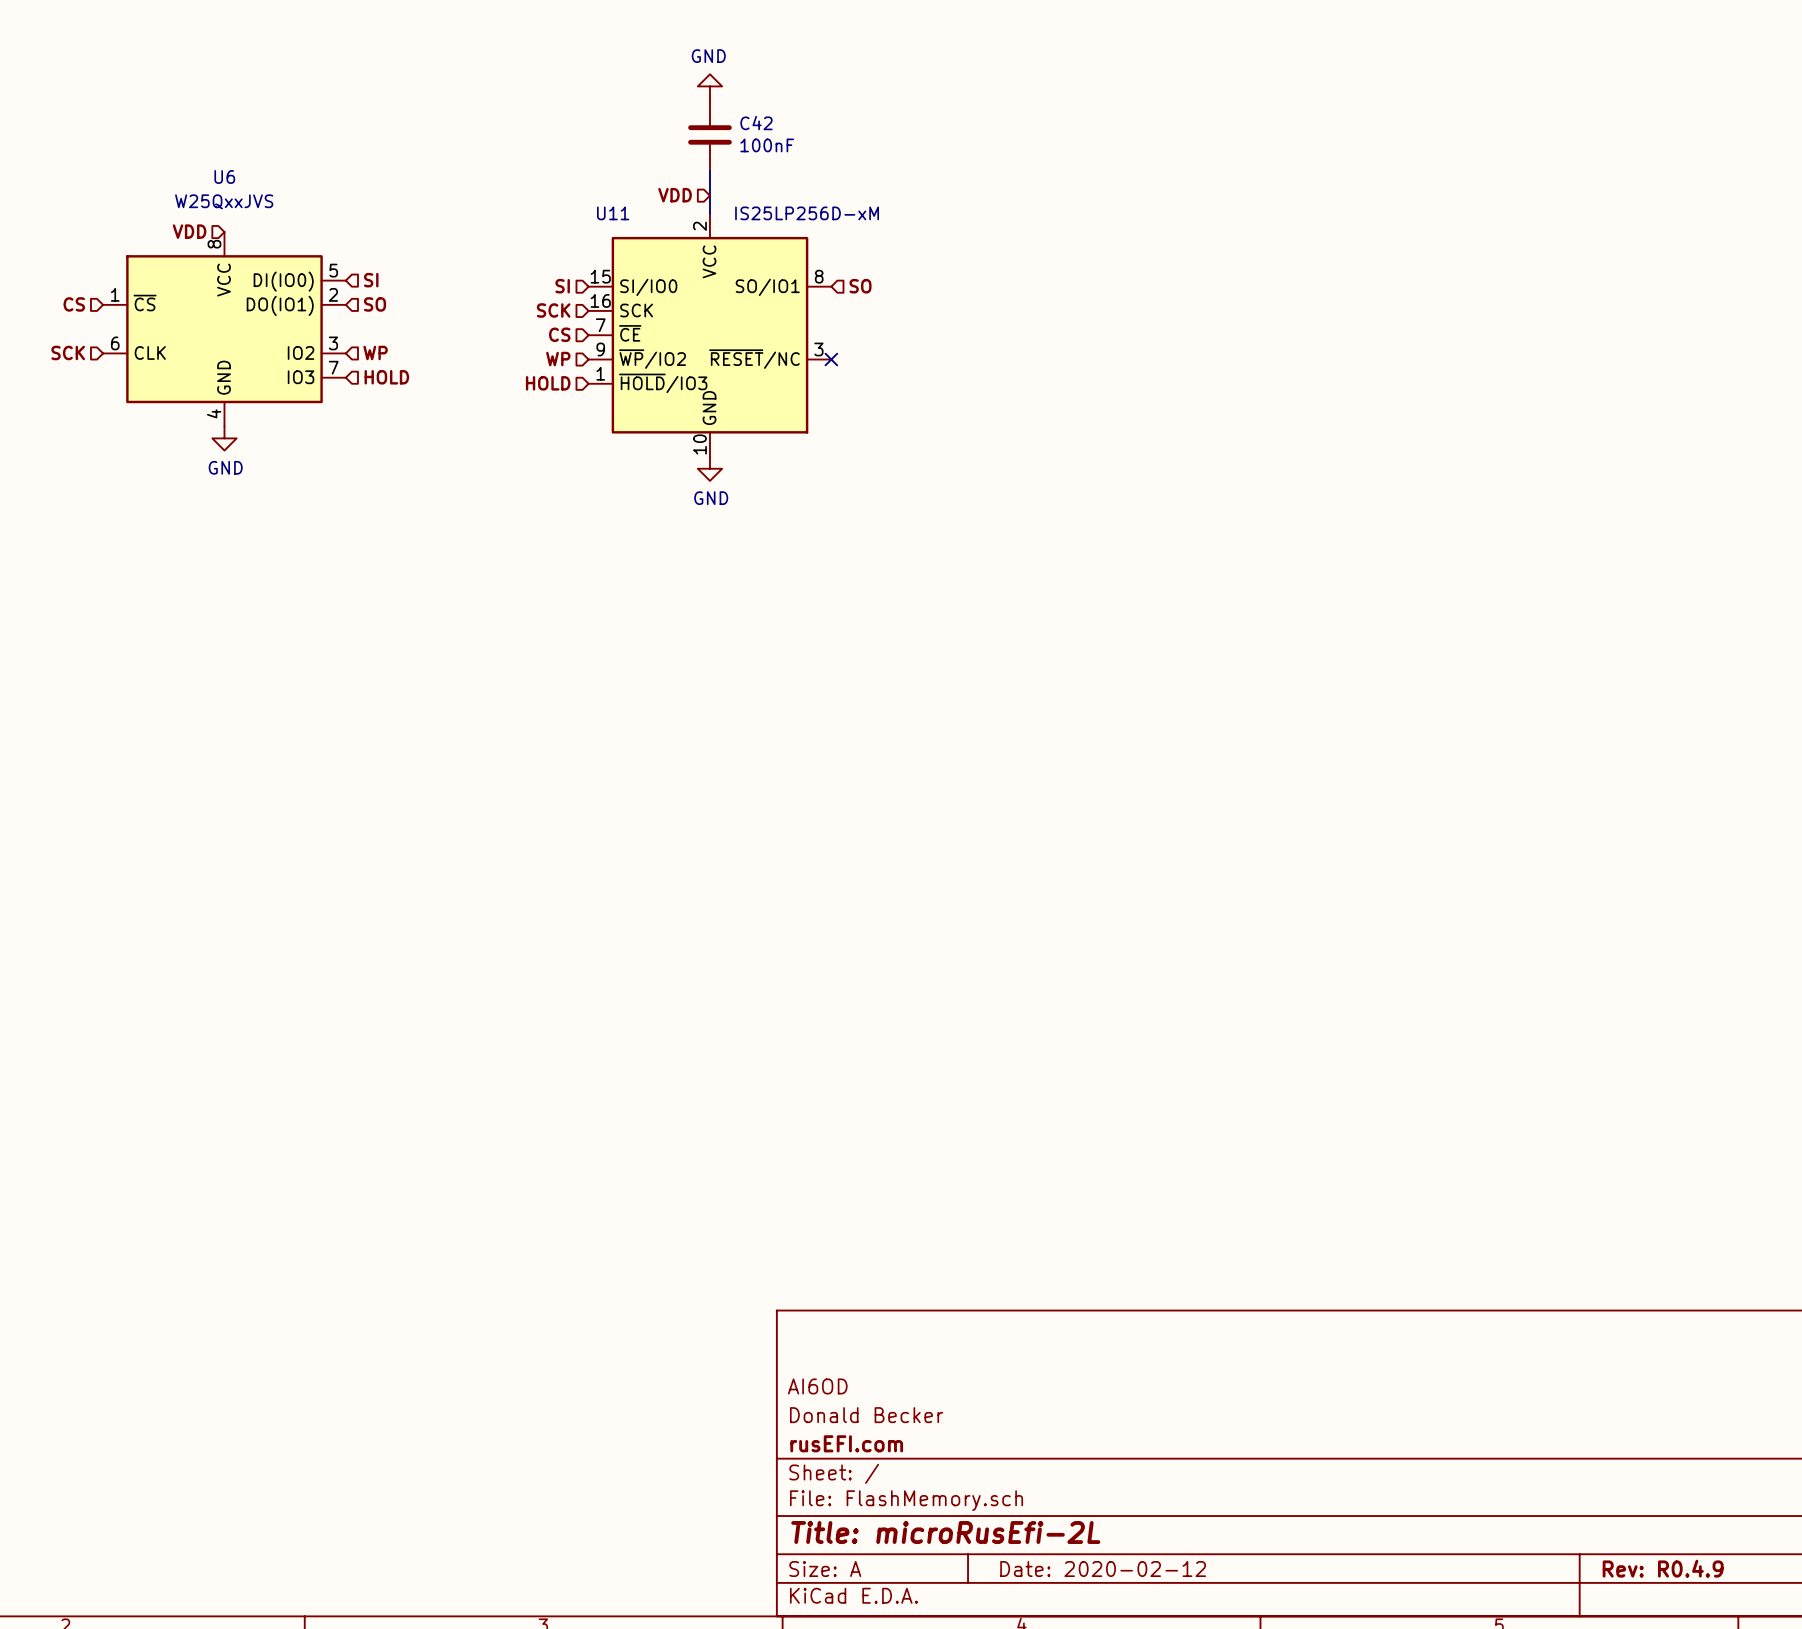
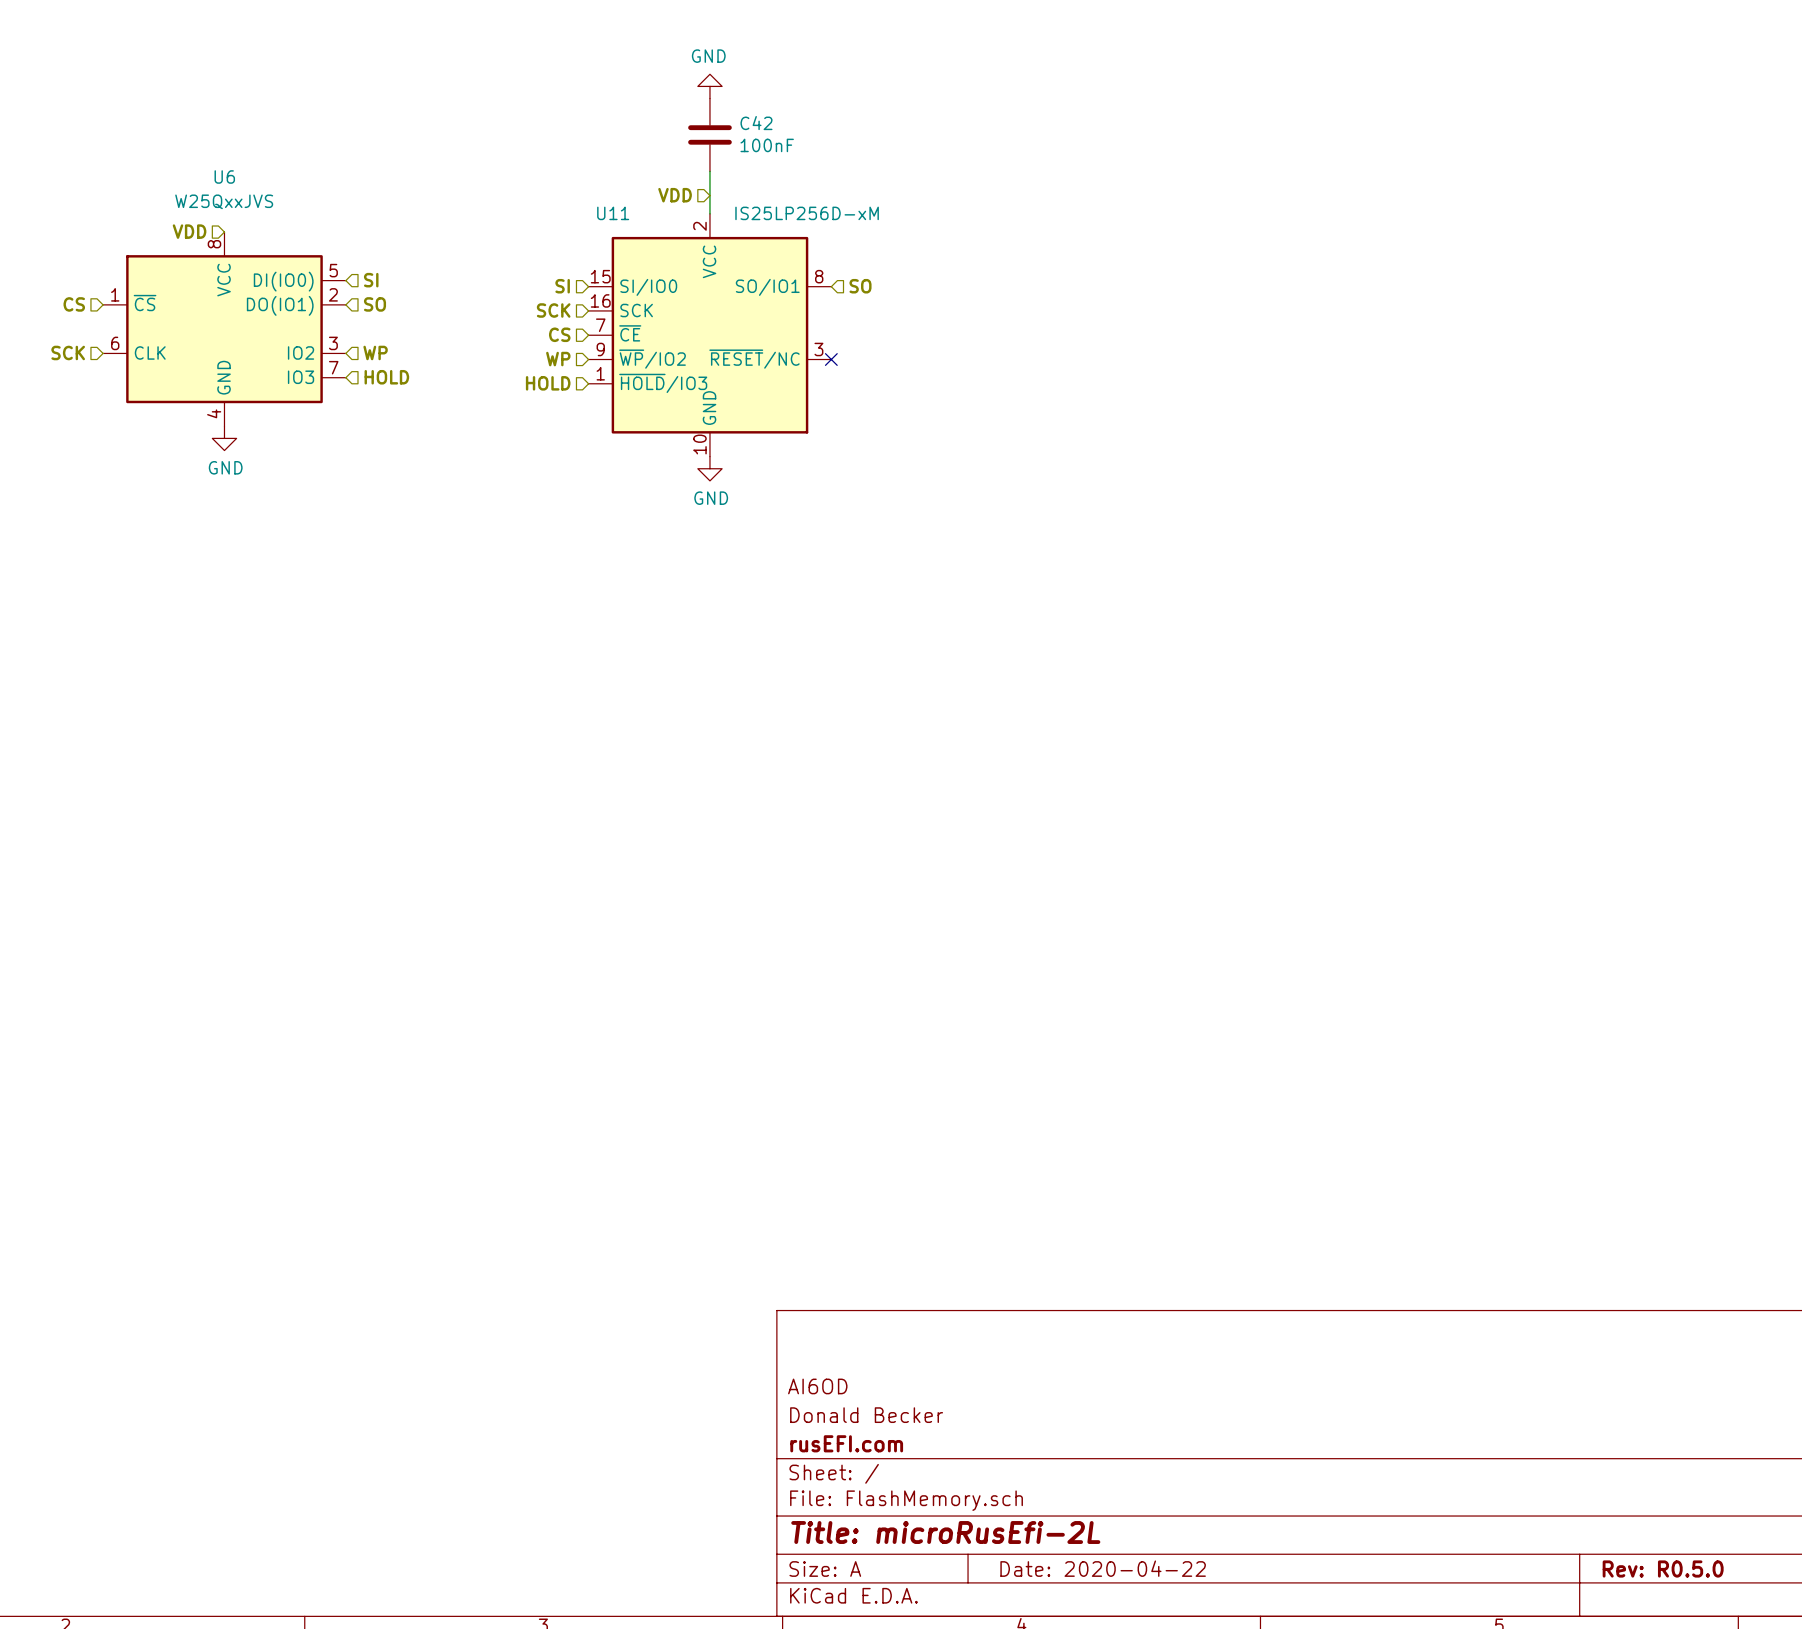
title block: Rev: R0.4.9 (1663, 1568) -> Rev: R0.5.0 (1663, 1569)
title block: Date: 2020-02-12 (1103, 1569) -> Date: 2020-04-22 (1103, 1568)

